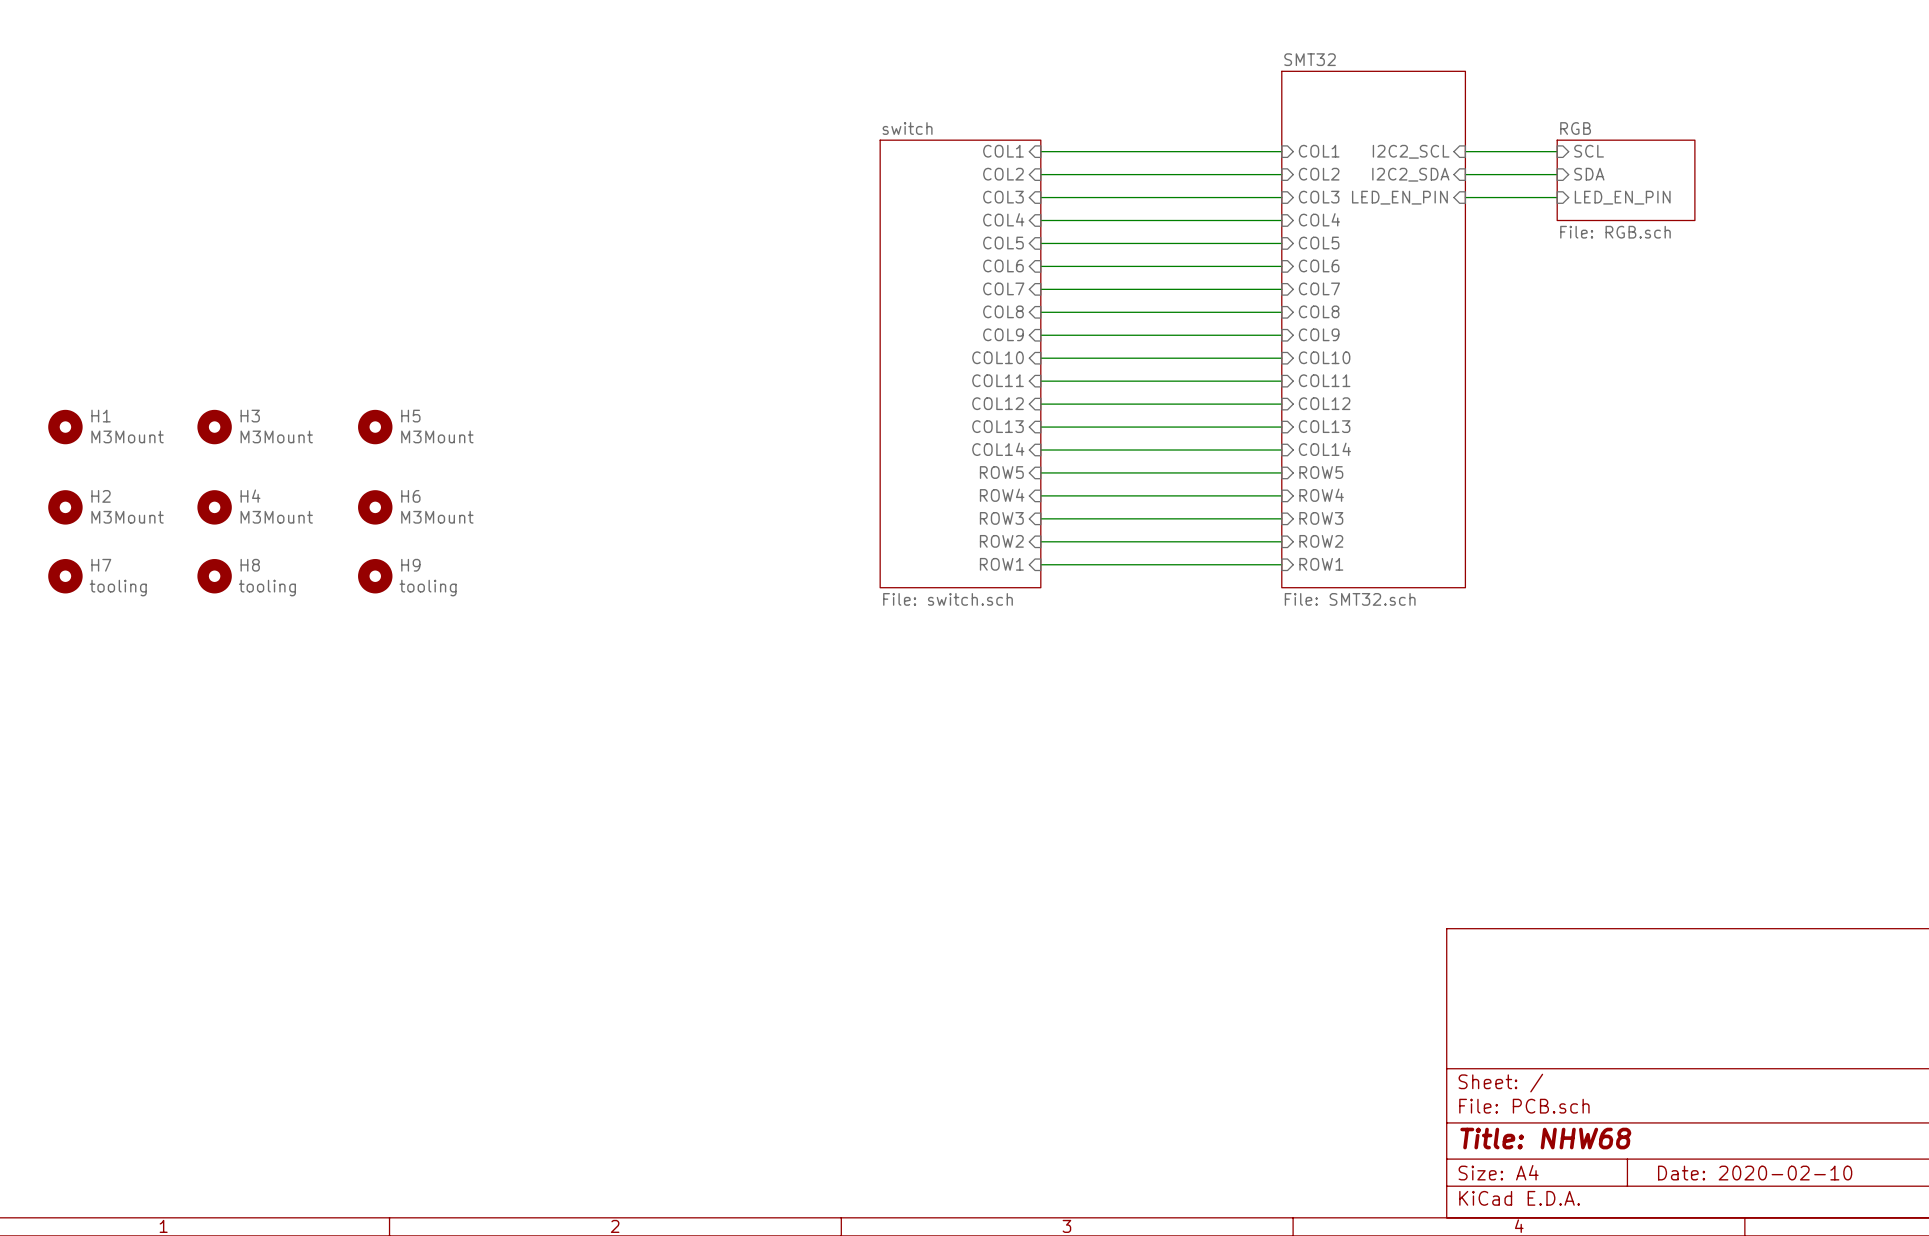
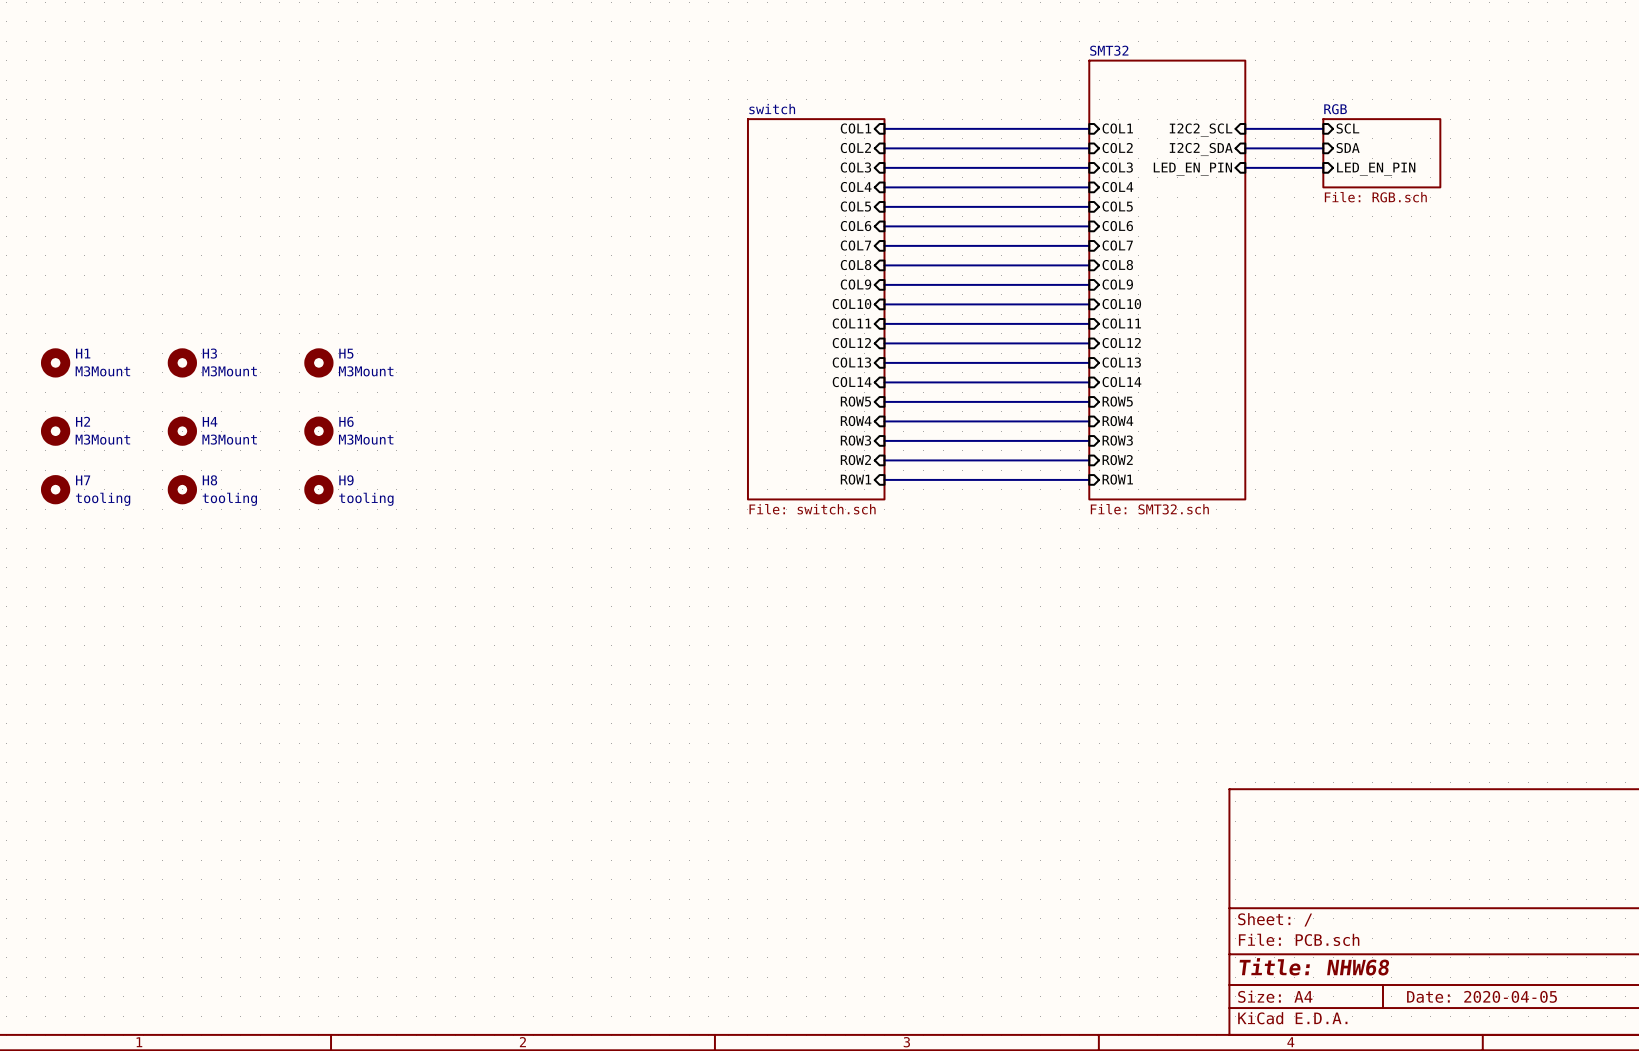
title block: Date: 2020-02-10 (1755, 1173) -> Date: 2020-04-05 (1482, 996)

